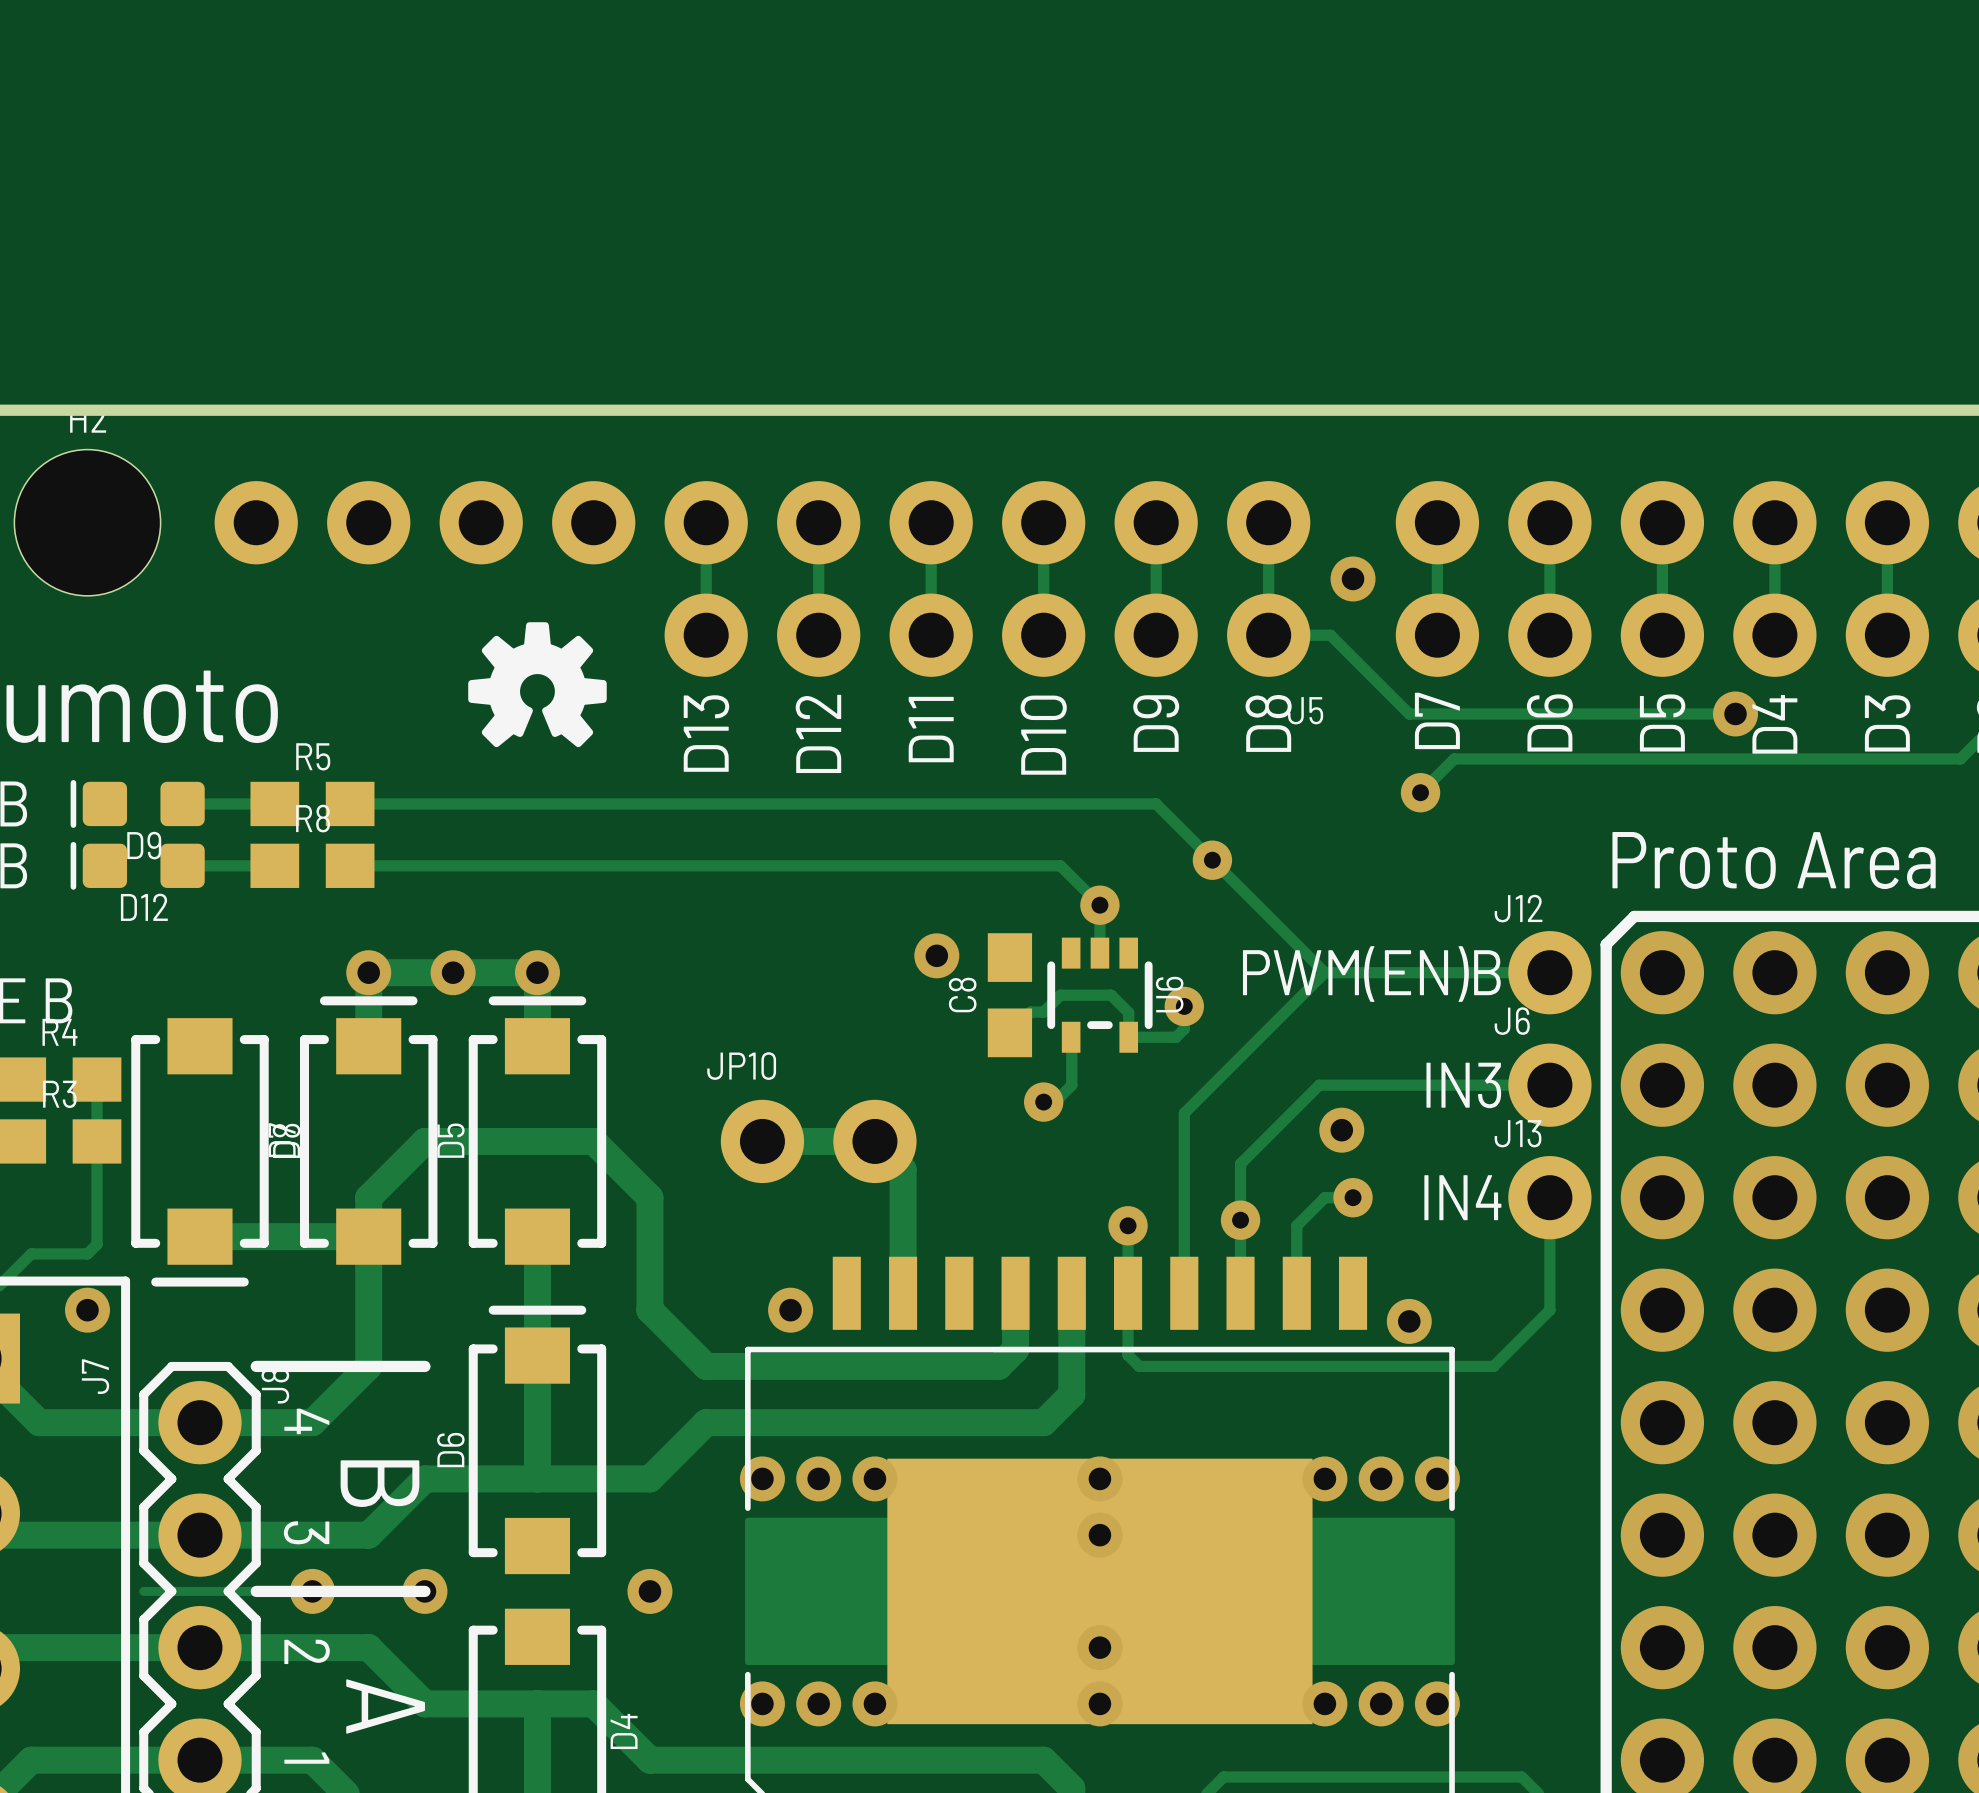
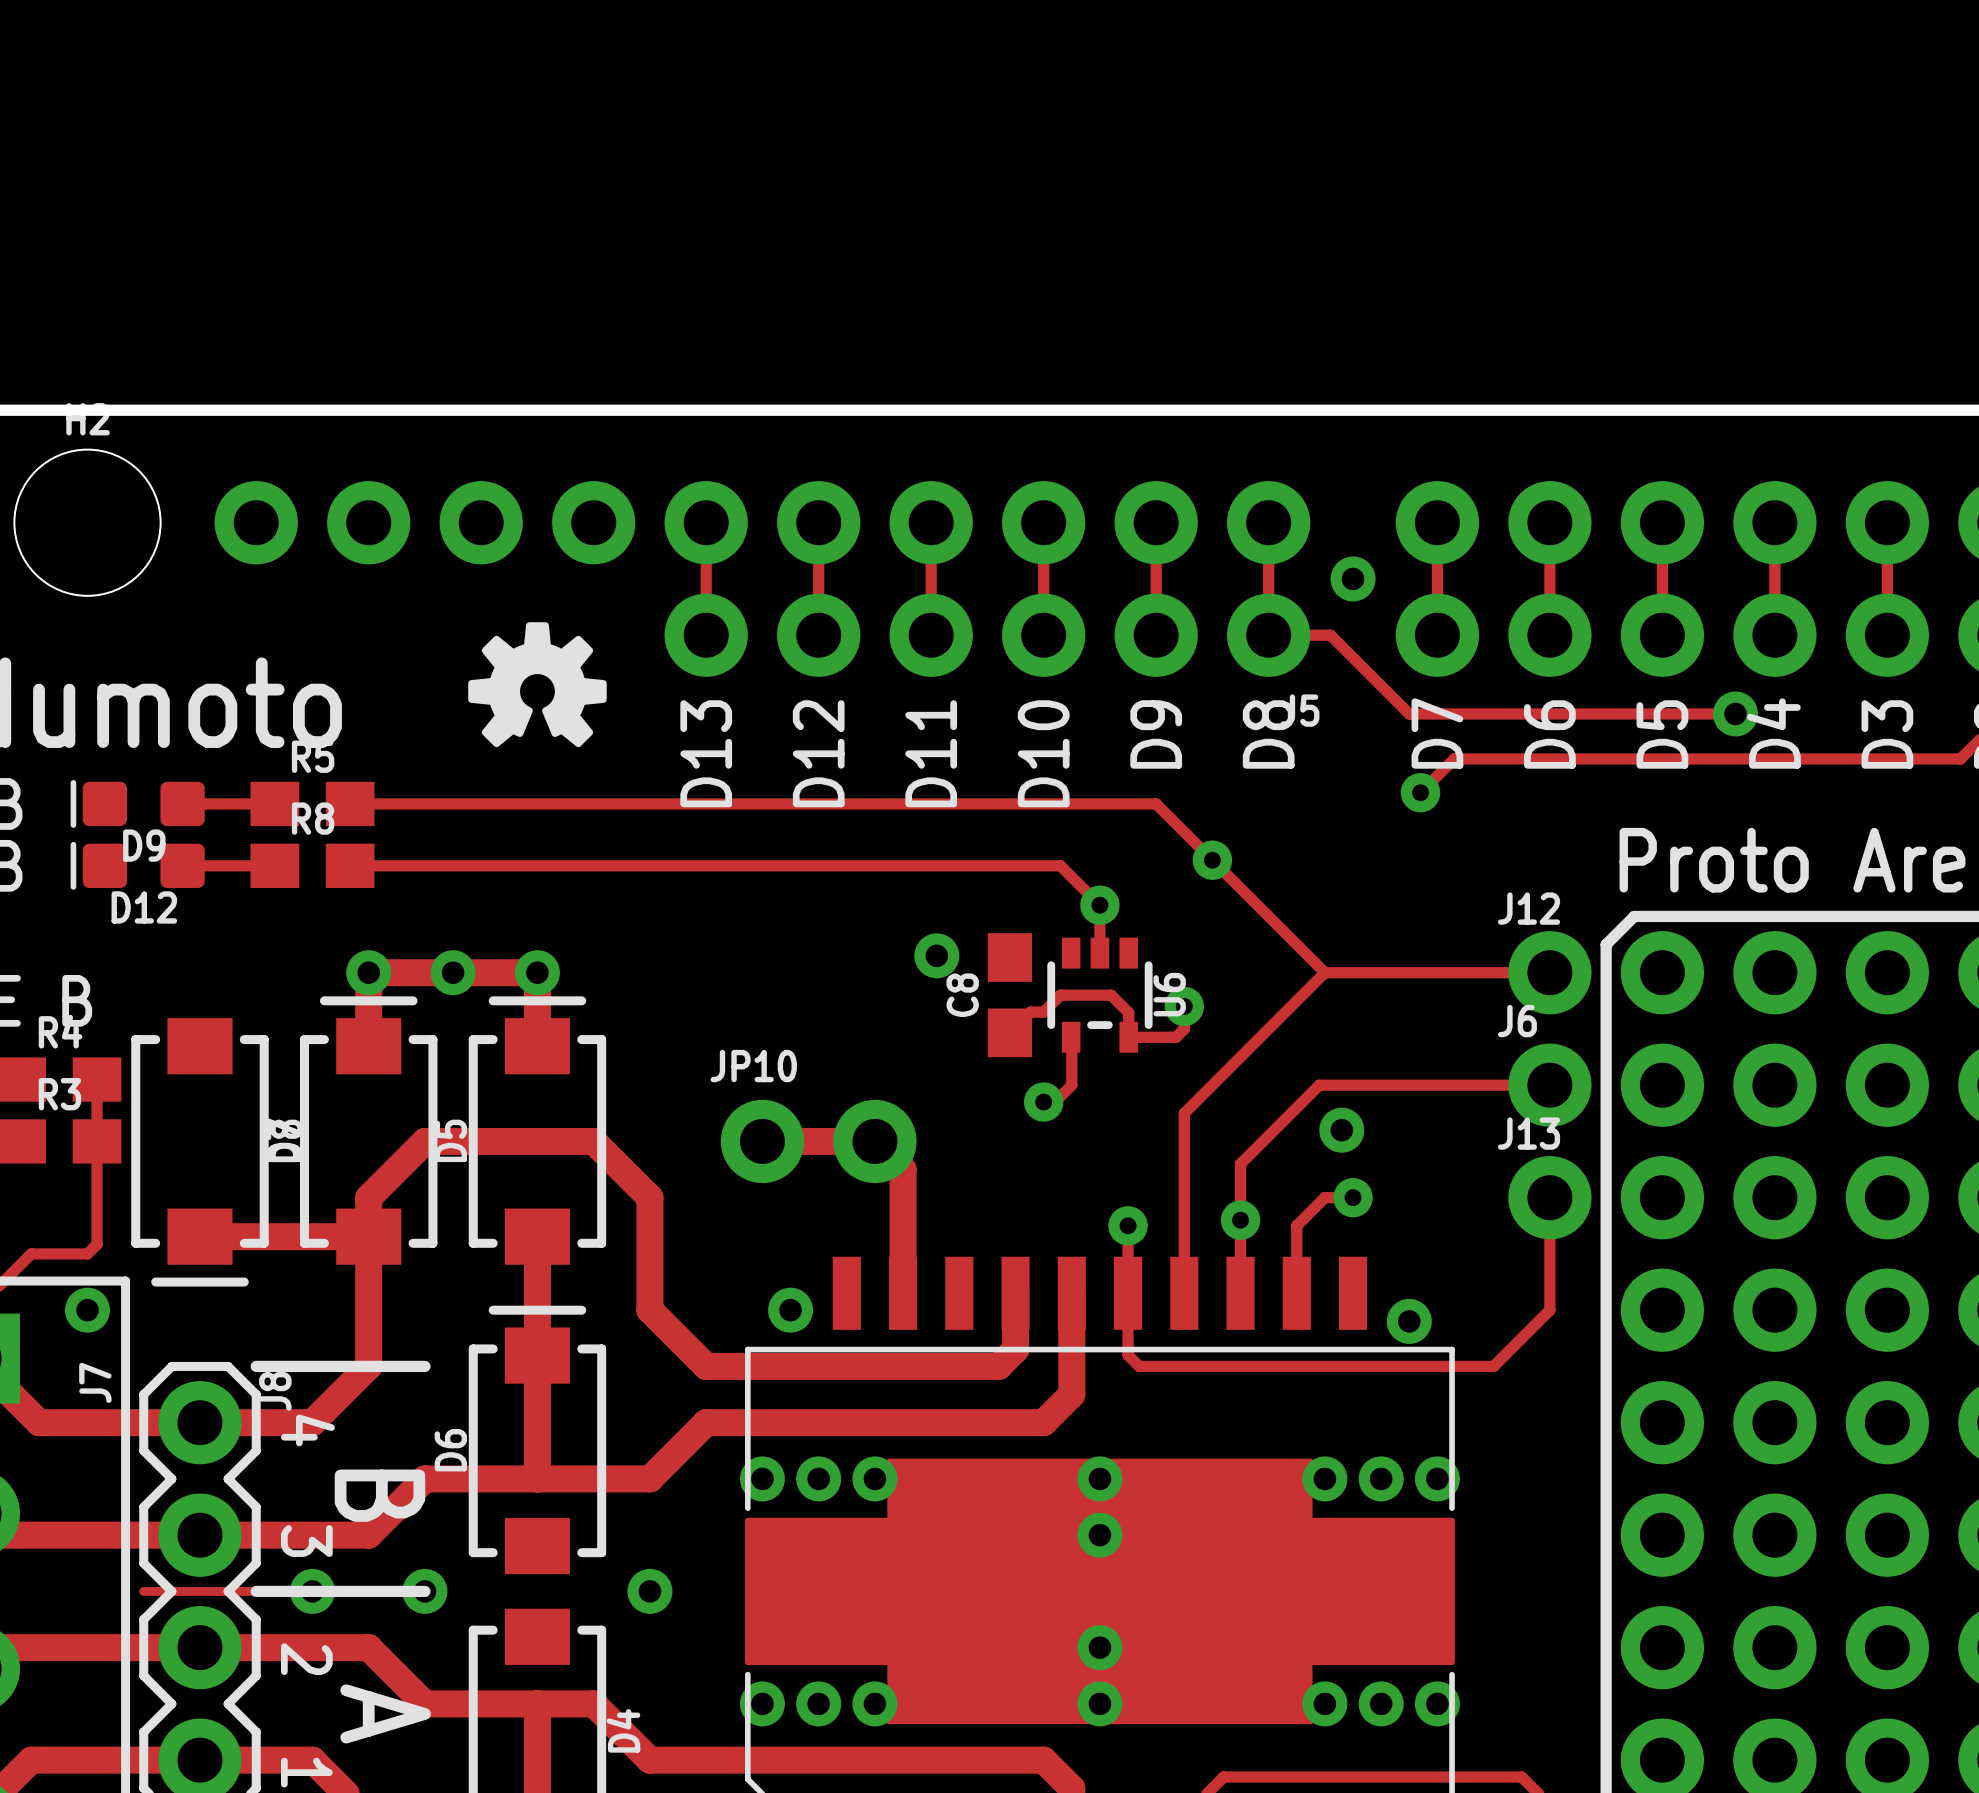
text: PWM(EN)B (1371, 974) -> none
text: IN3 (1463, 1085) -> none
text: IN4 (1462, 1197) -> none

